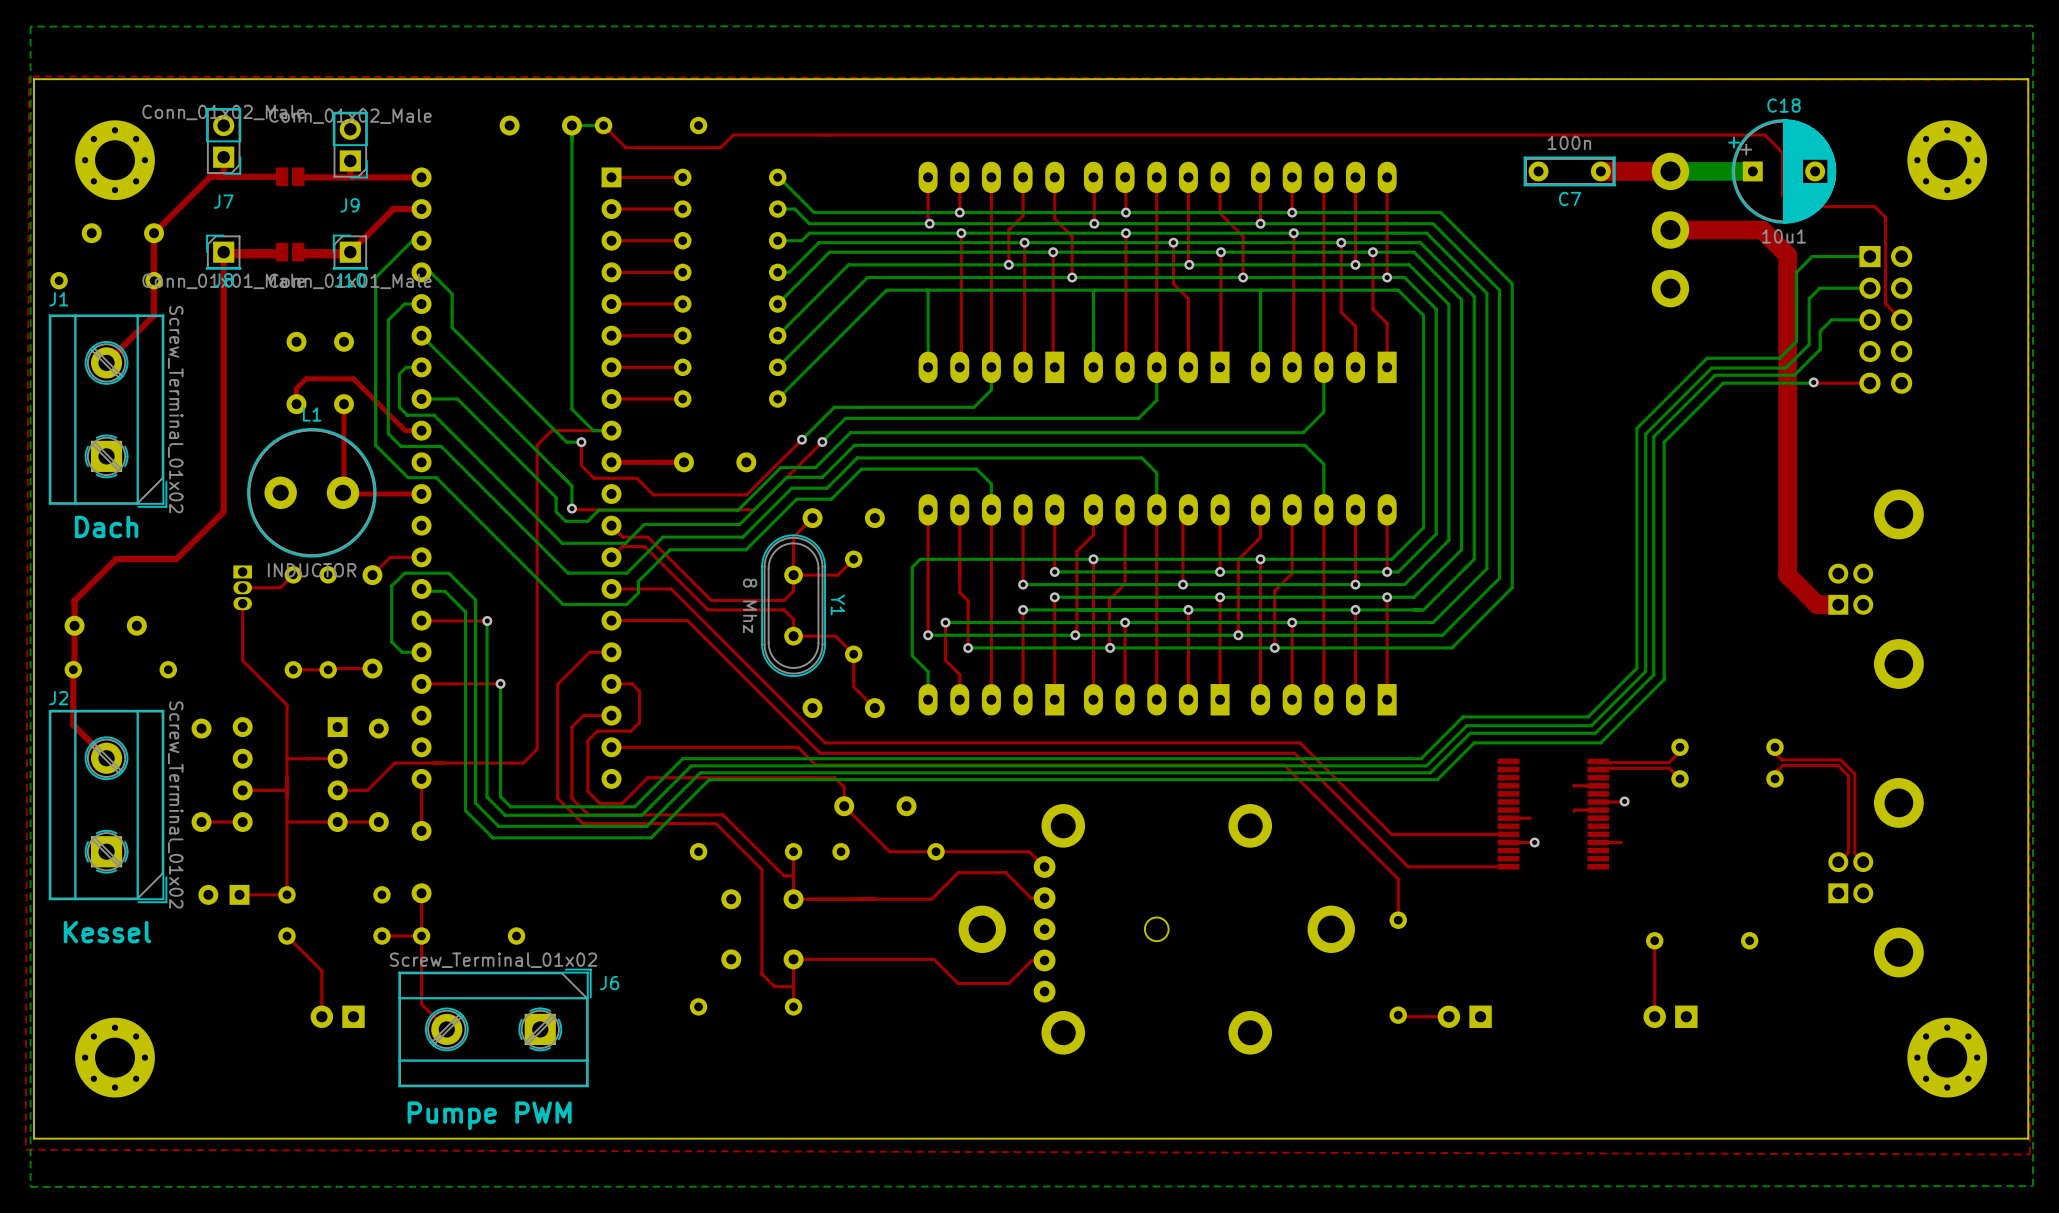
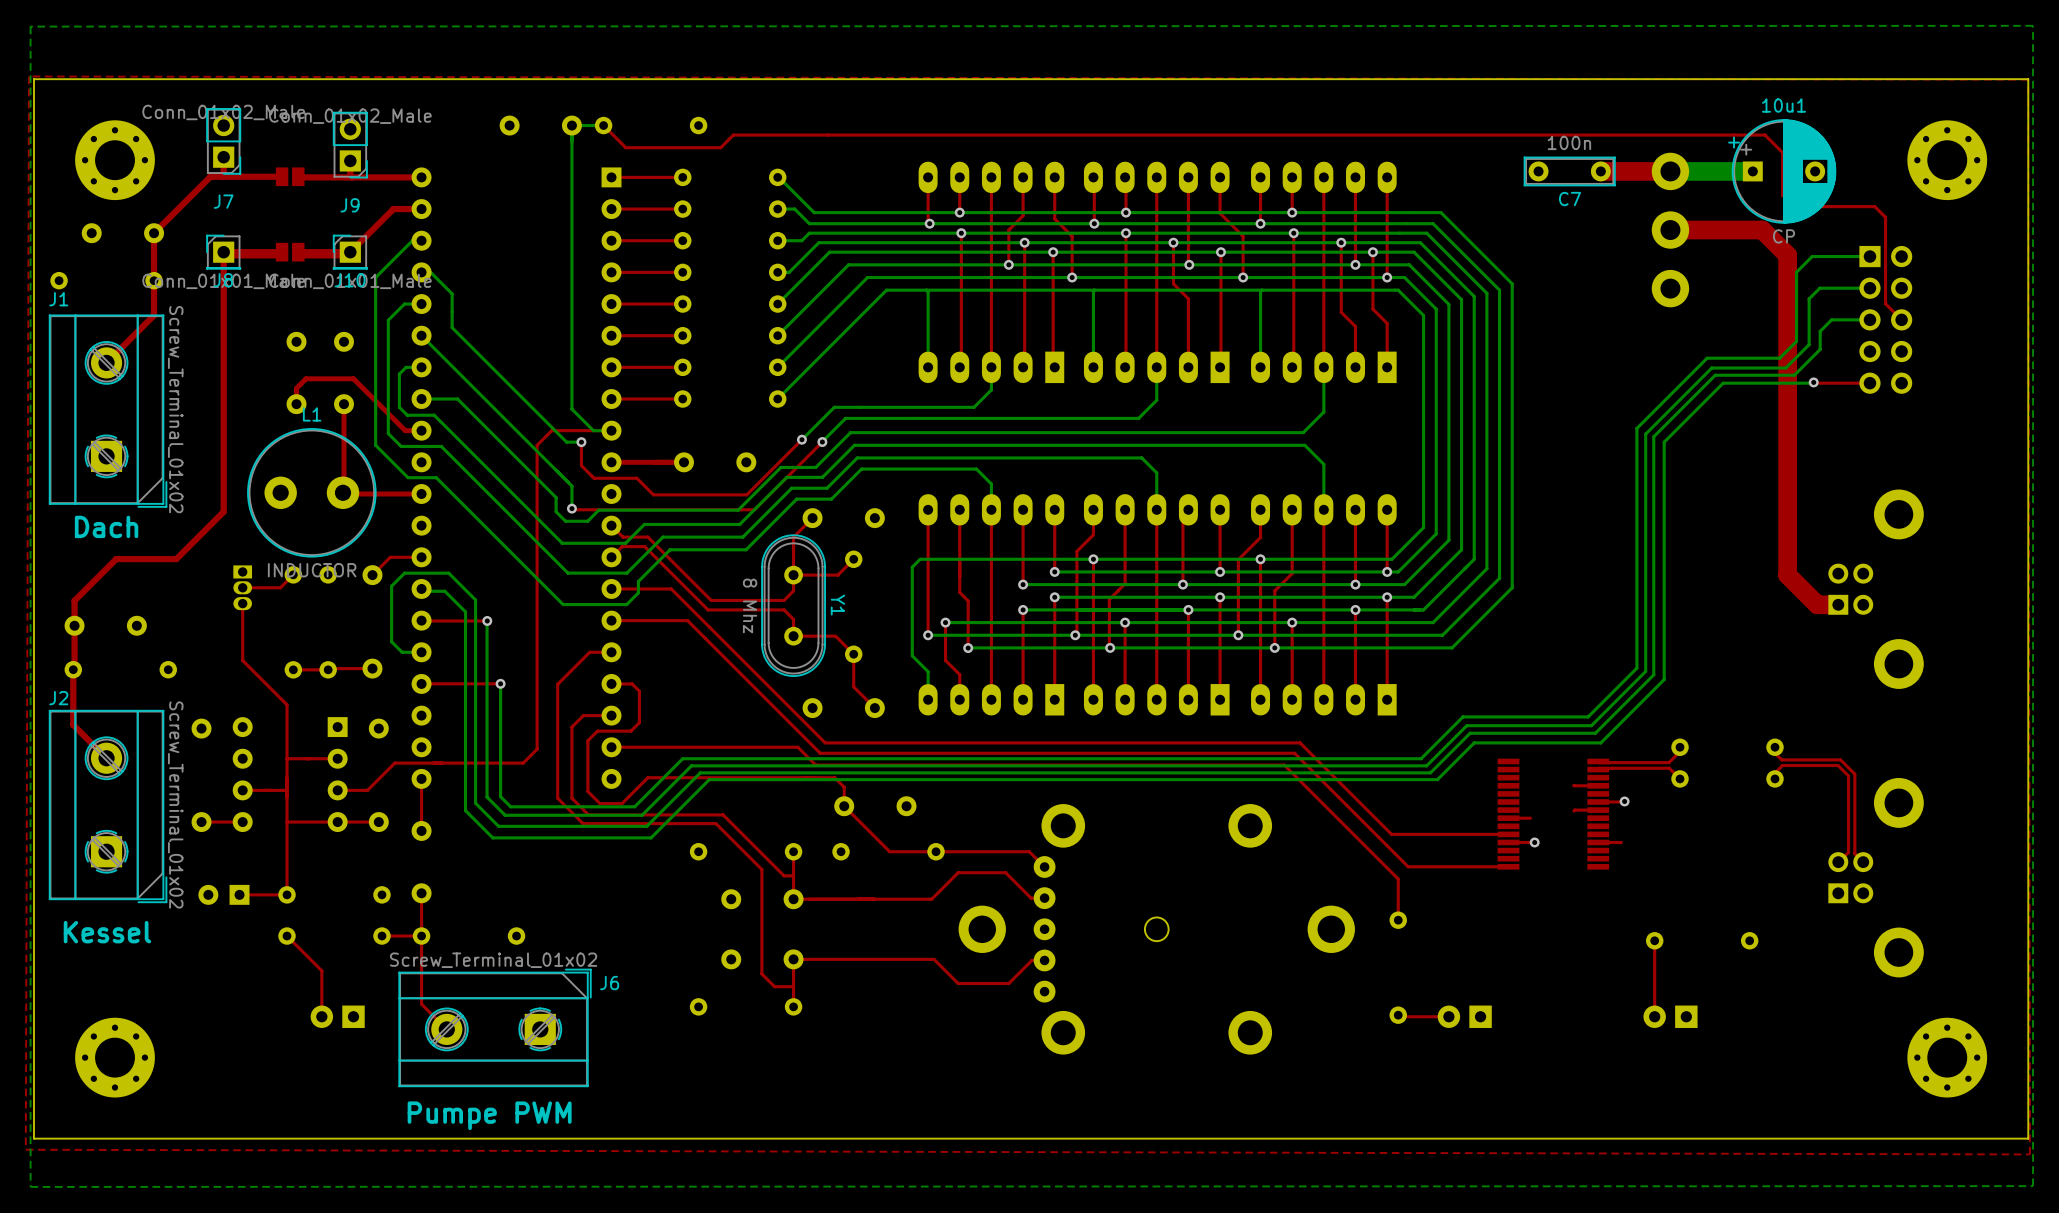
C18 name: C18 (1783, 105) -> 10u1 (1783, 105)
C18 value: 10u1 (1783, 236) -> CP (1783, 236)

